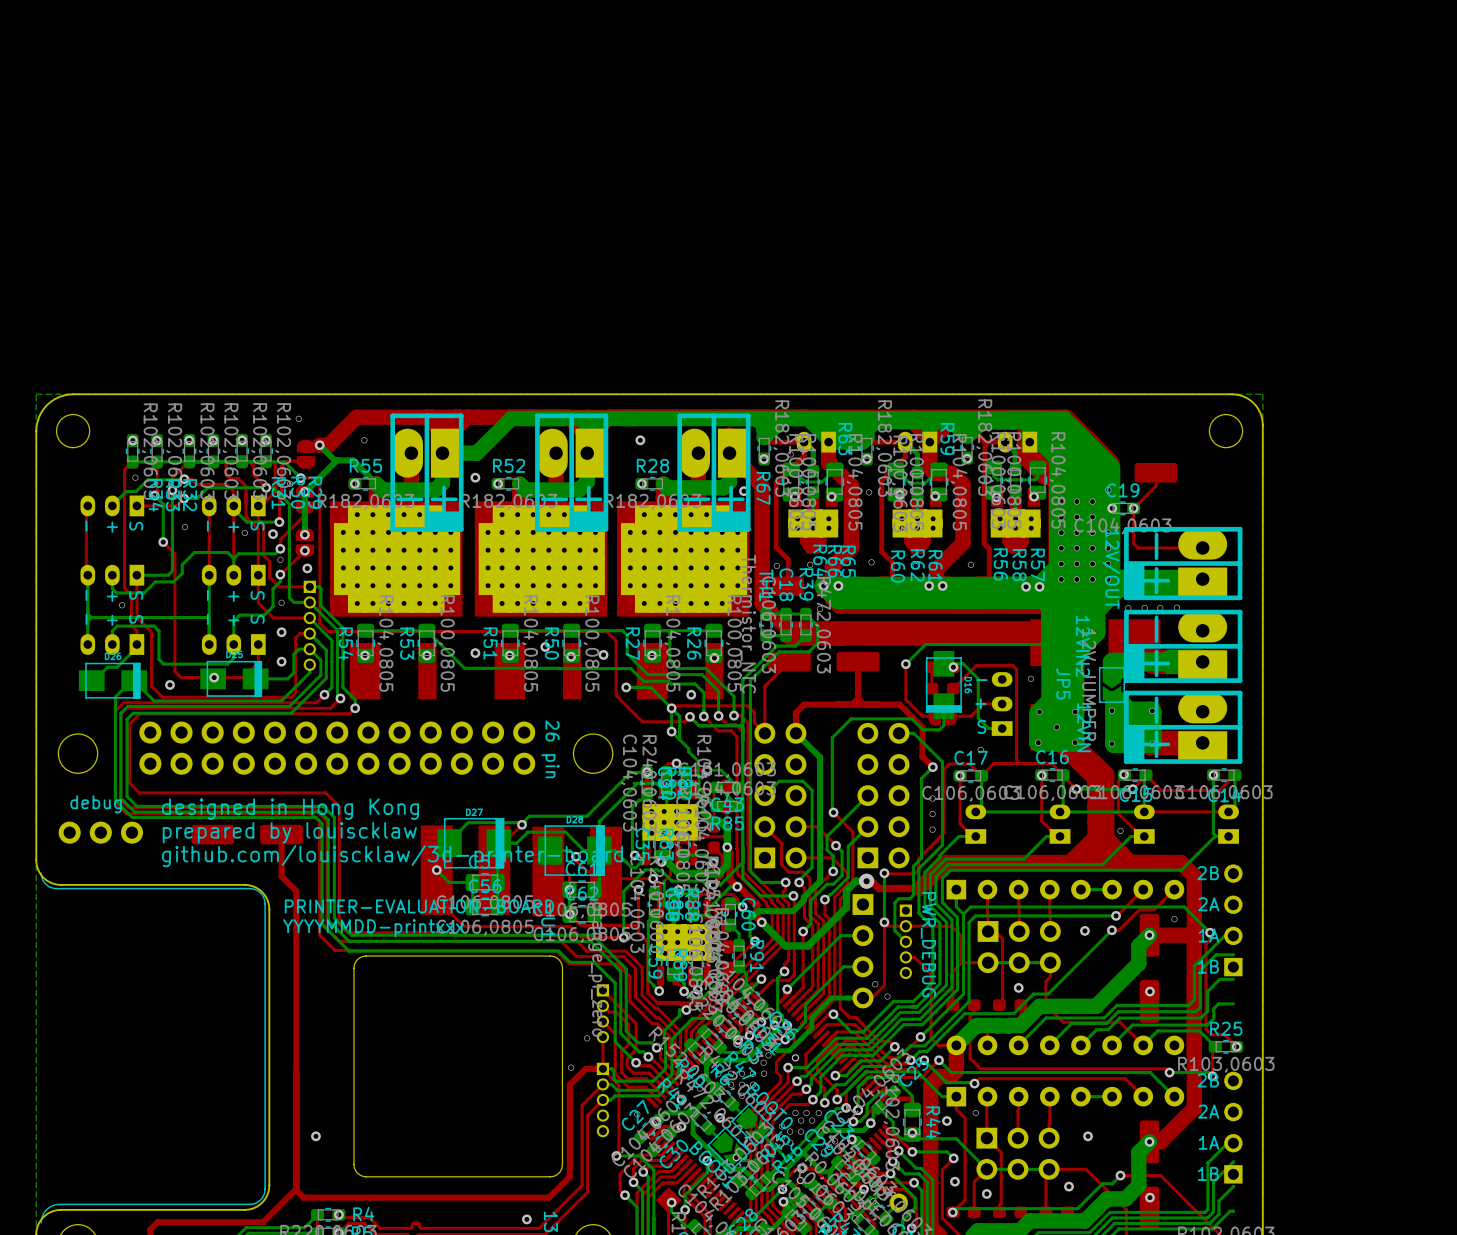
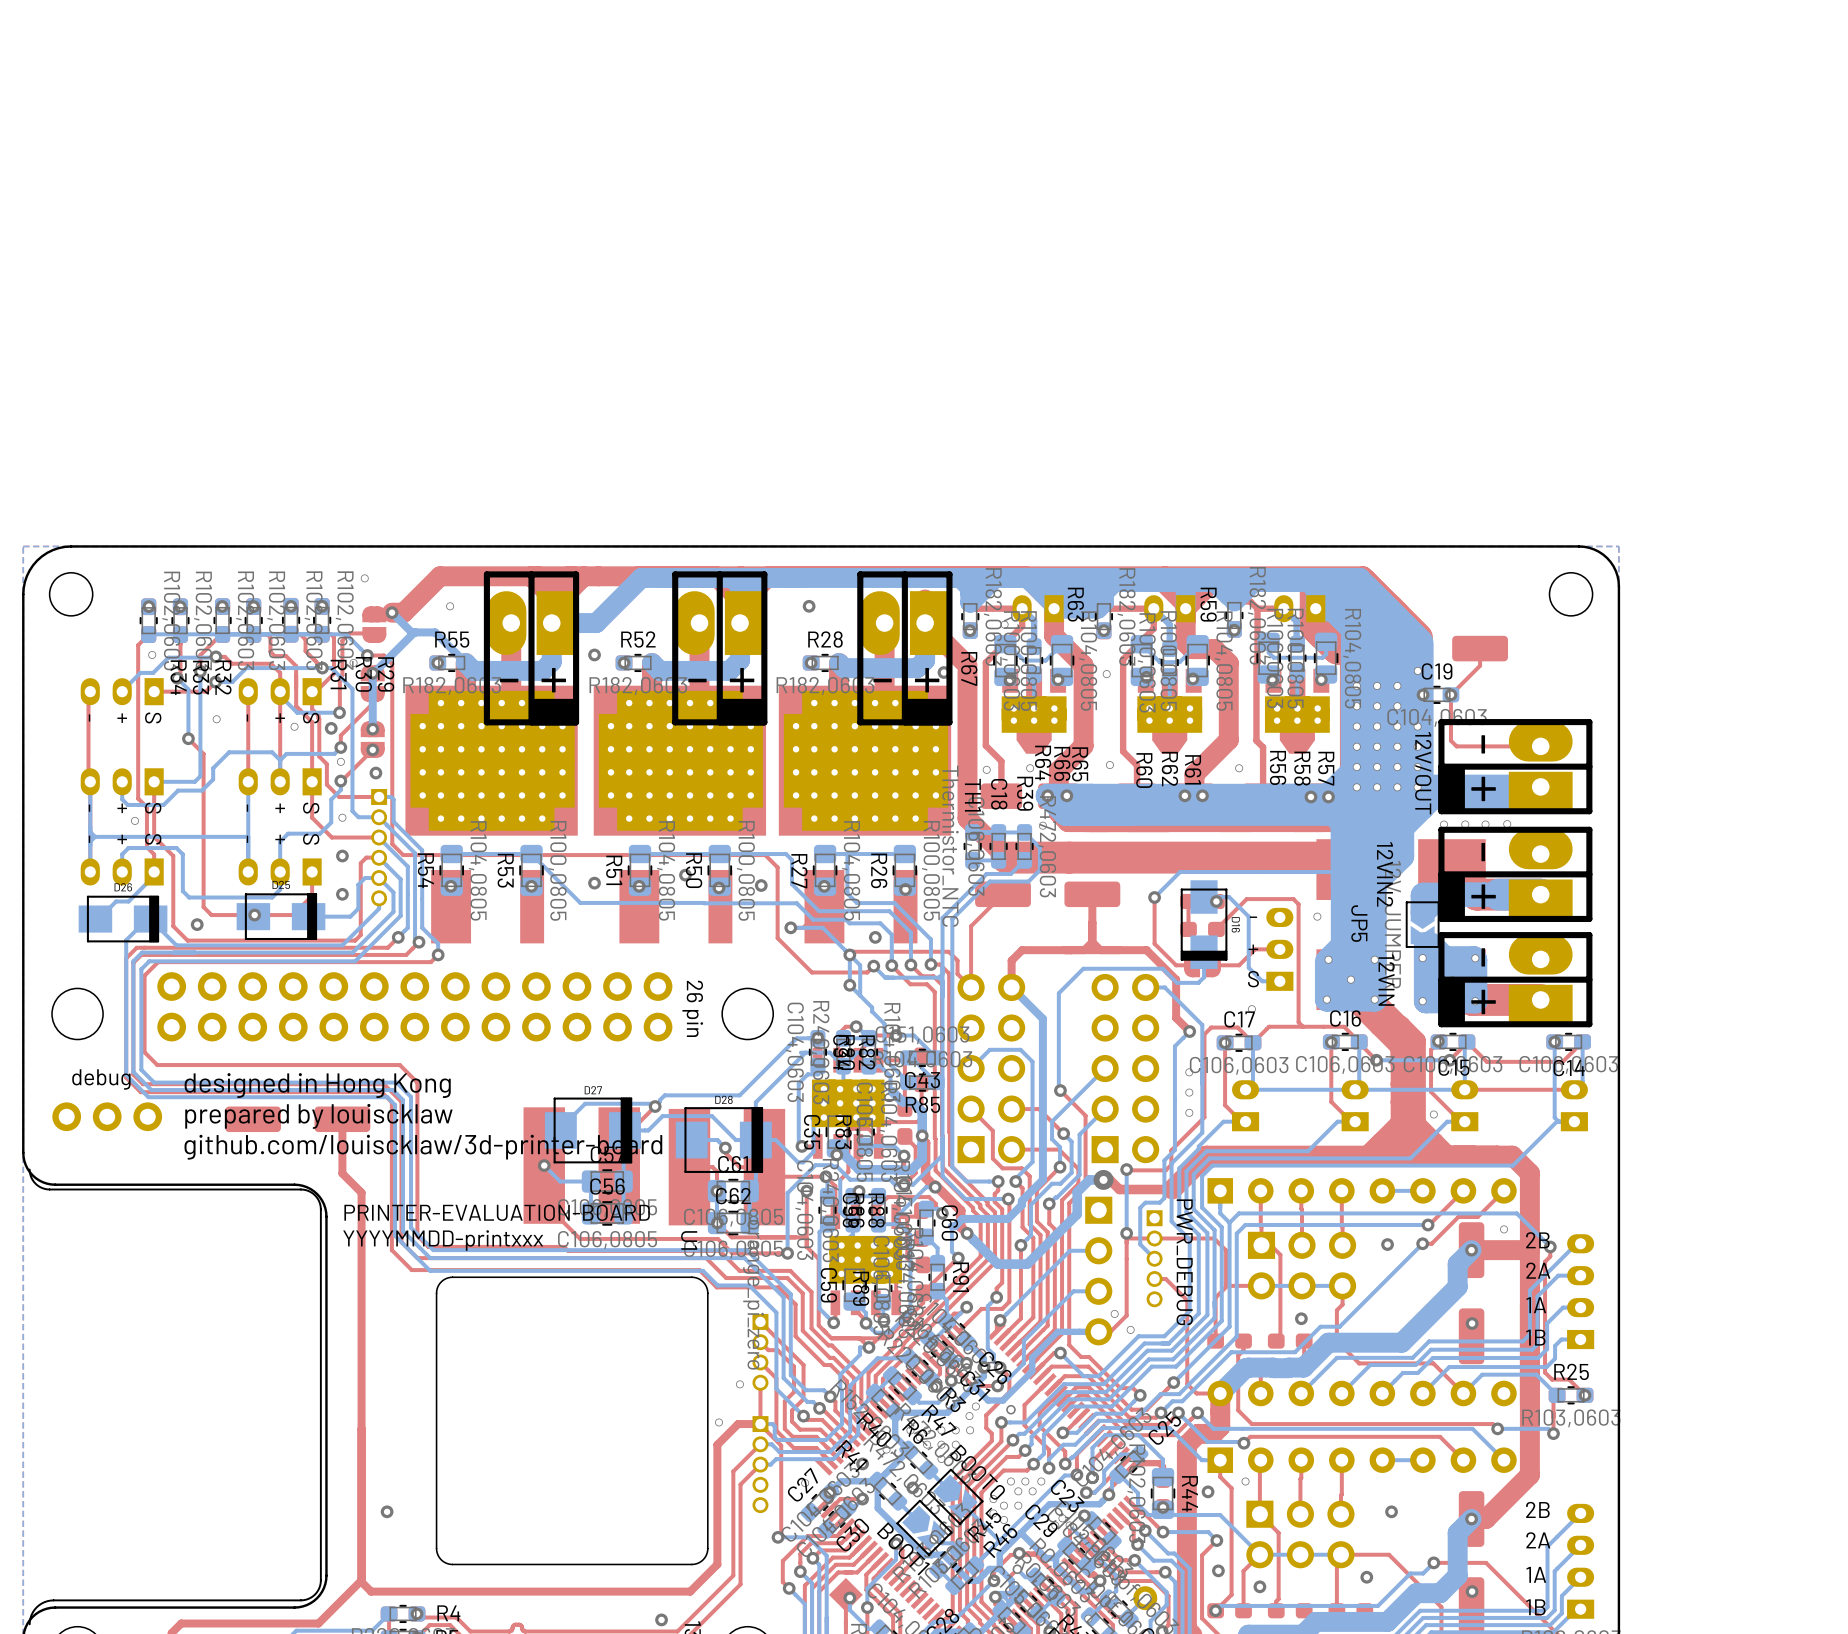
part: (1233, 920) -> none
part: none -> (1580, 1291)
part: (1233, 1127) -> none
part: none -> (1580, 1561)

